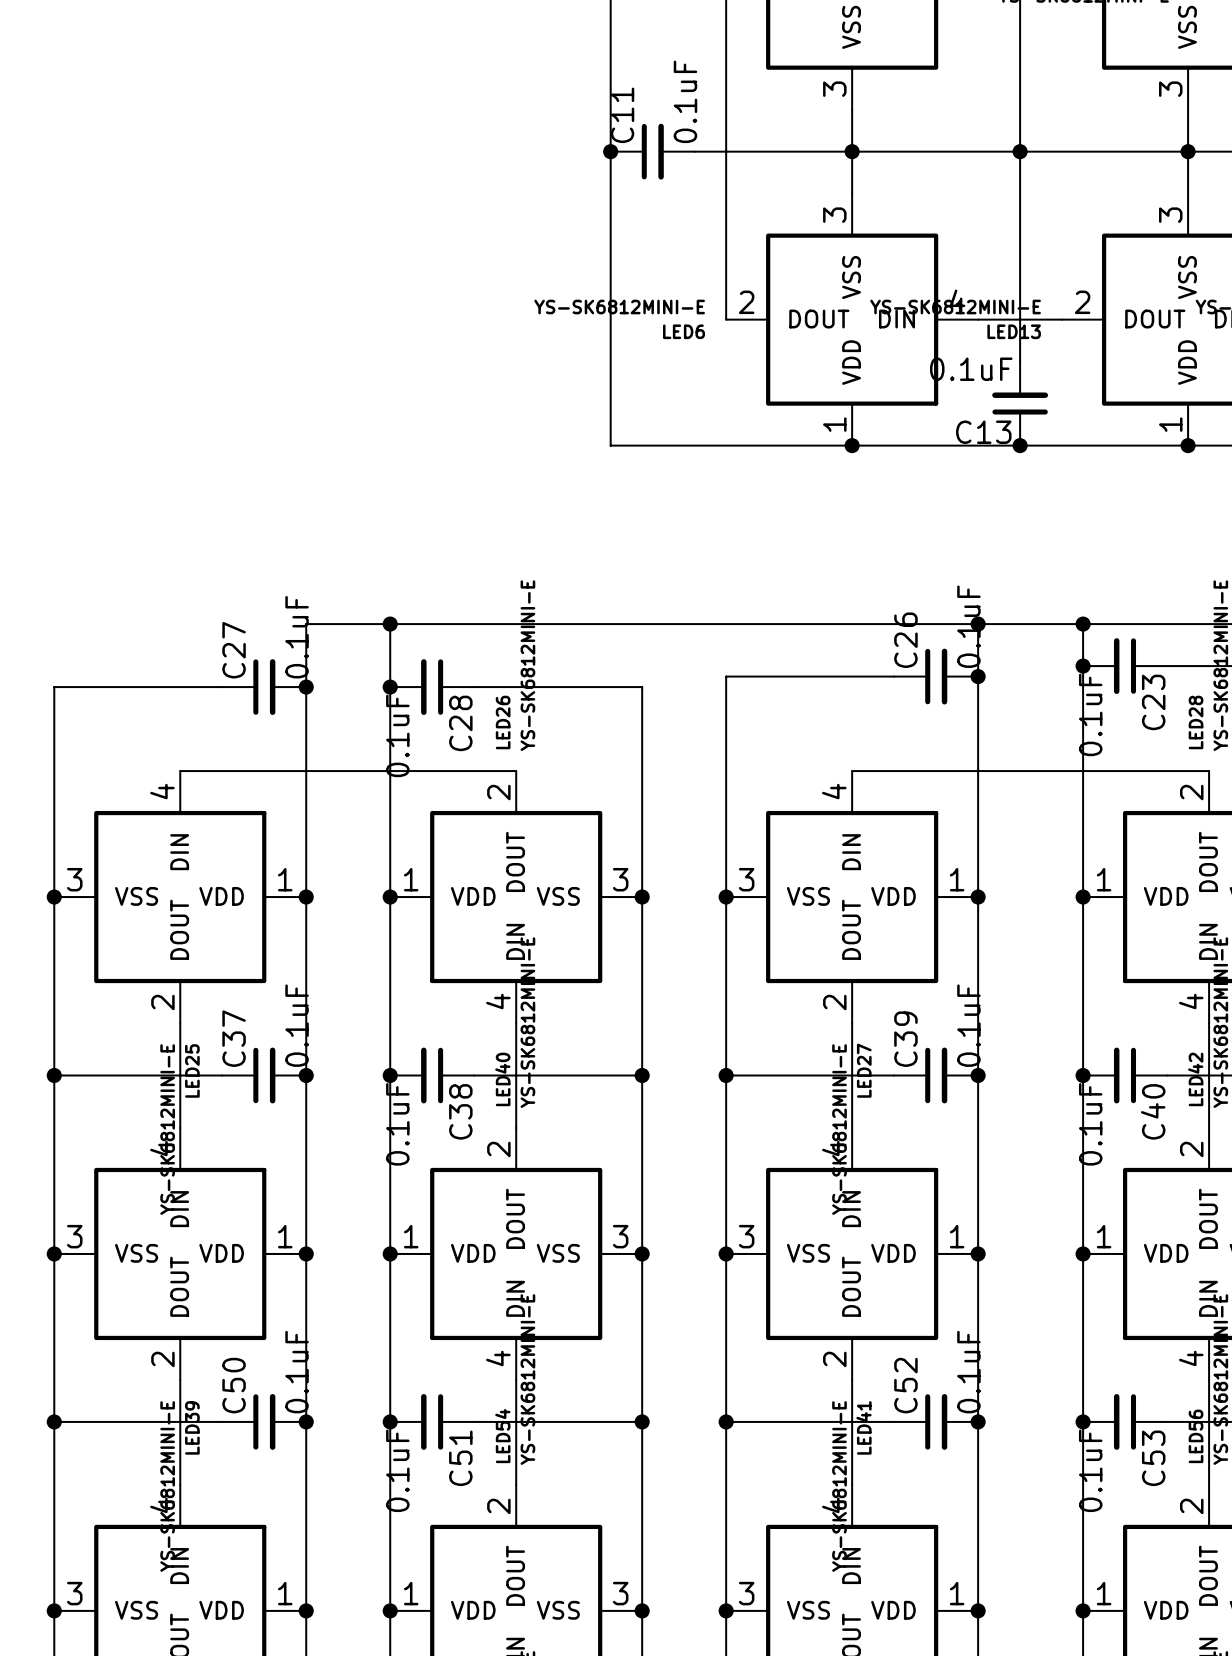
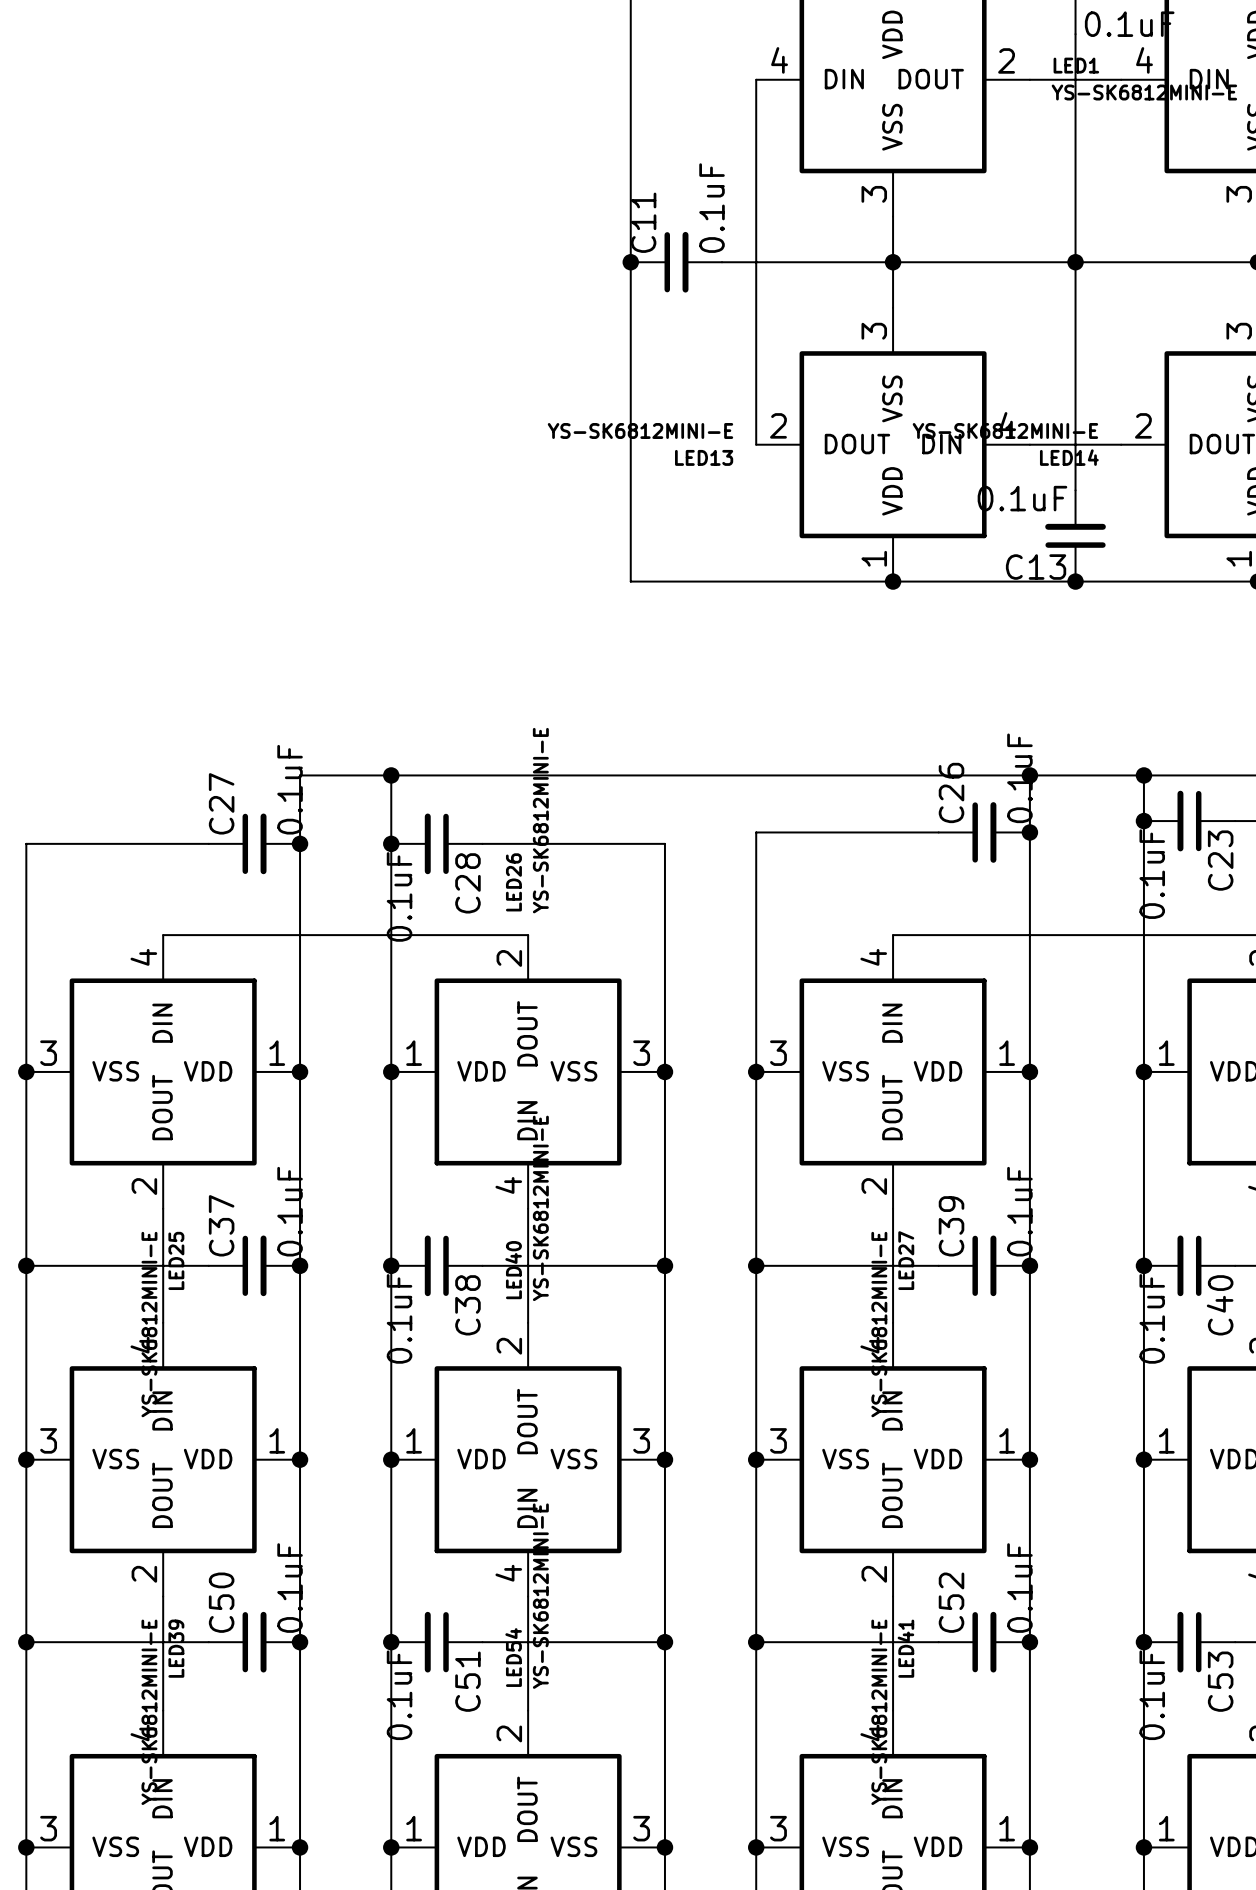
LED6 name: LED6 (683, 331) -> LED13 (704, 457)
LED13 name: LED13 (1014, 331) -> LED14 (1069, 457)

